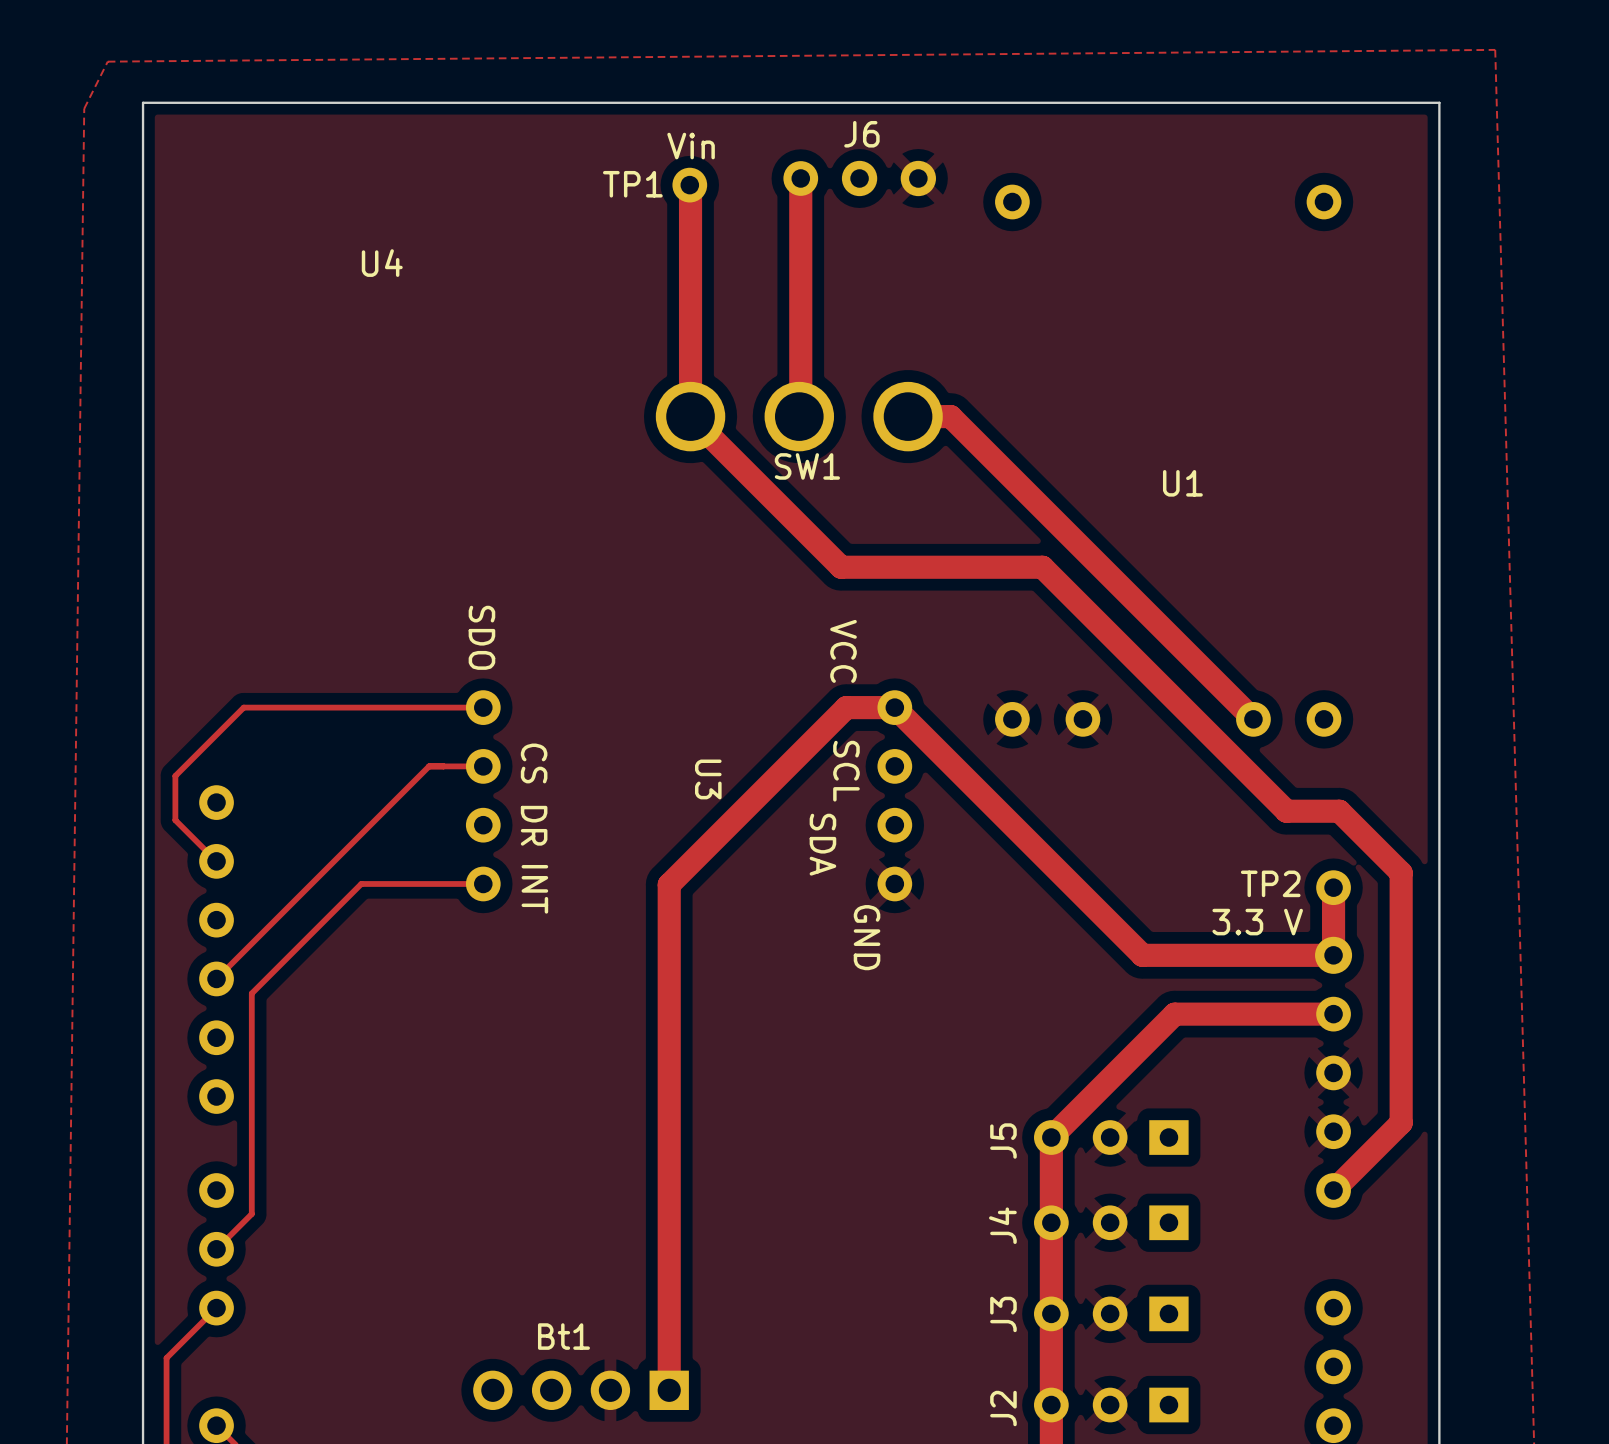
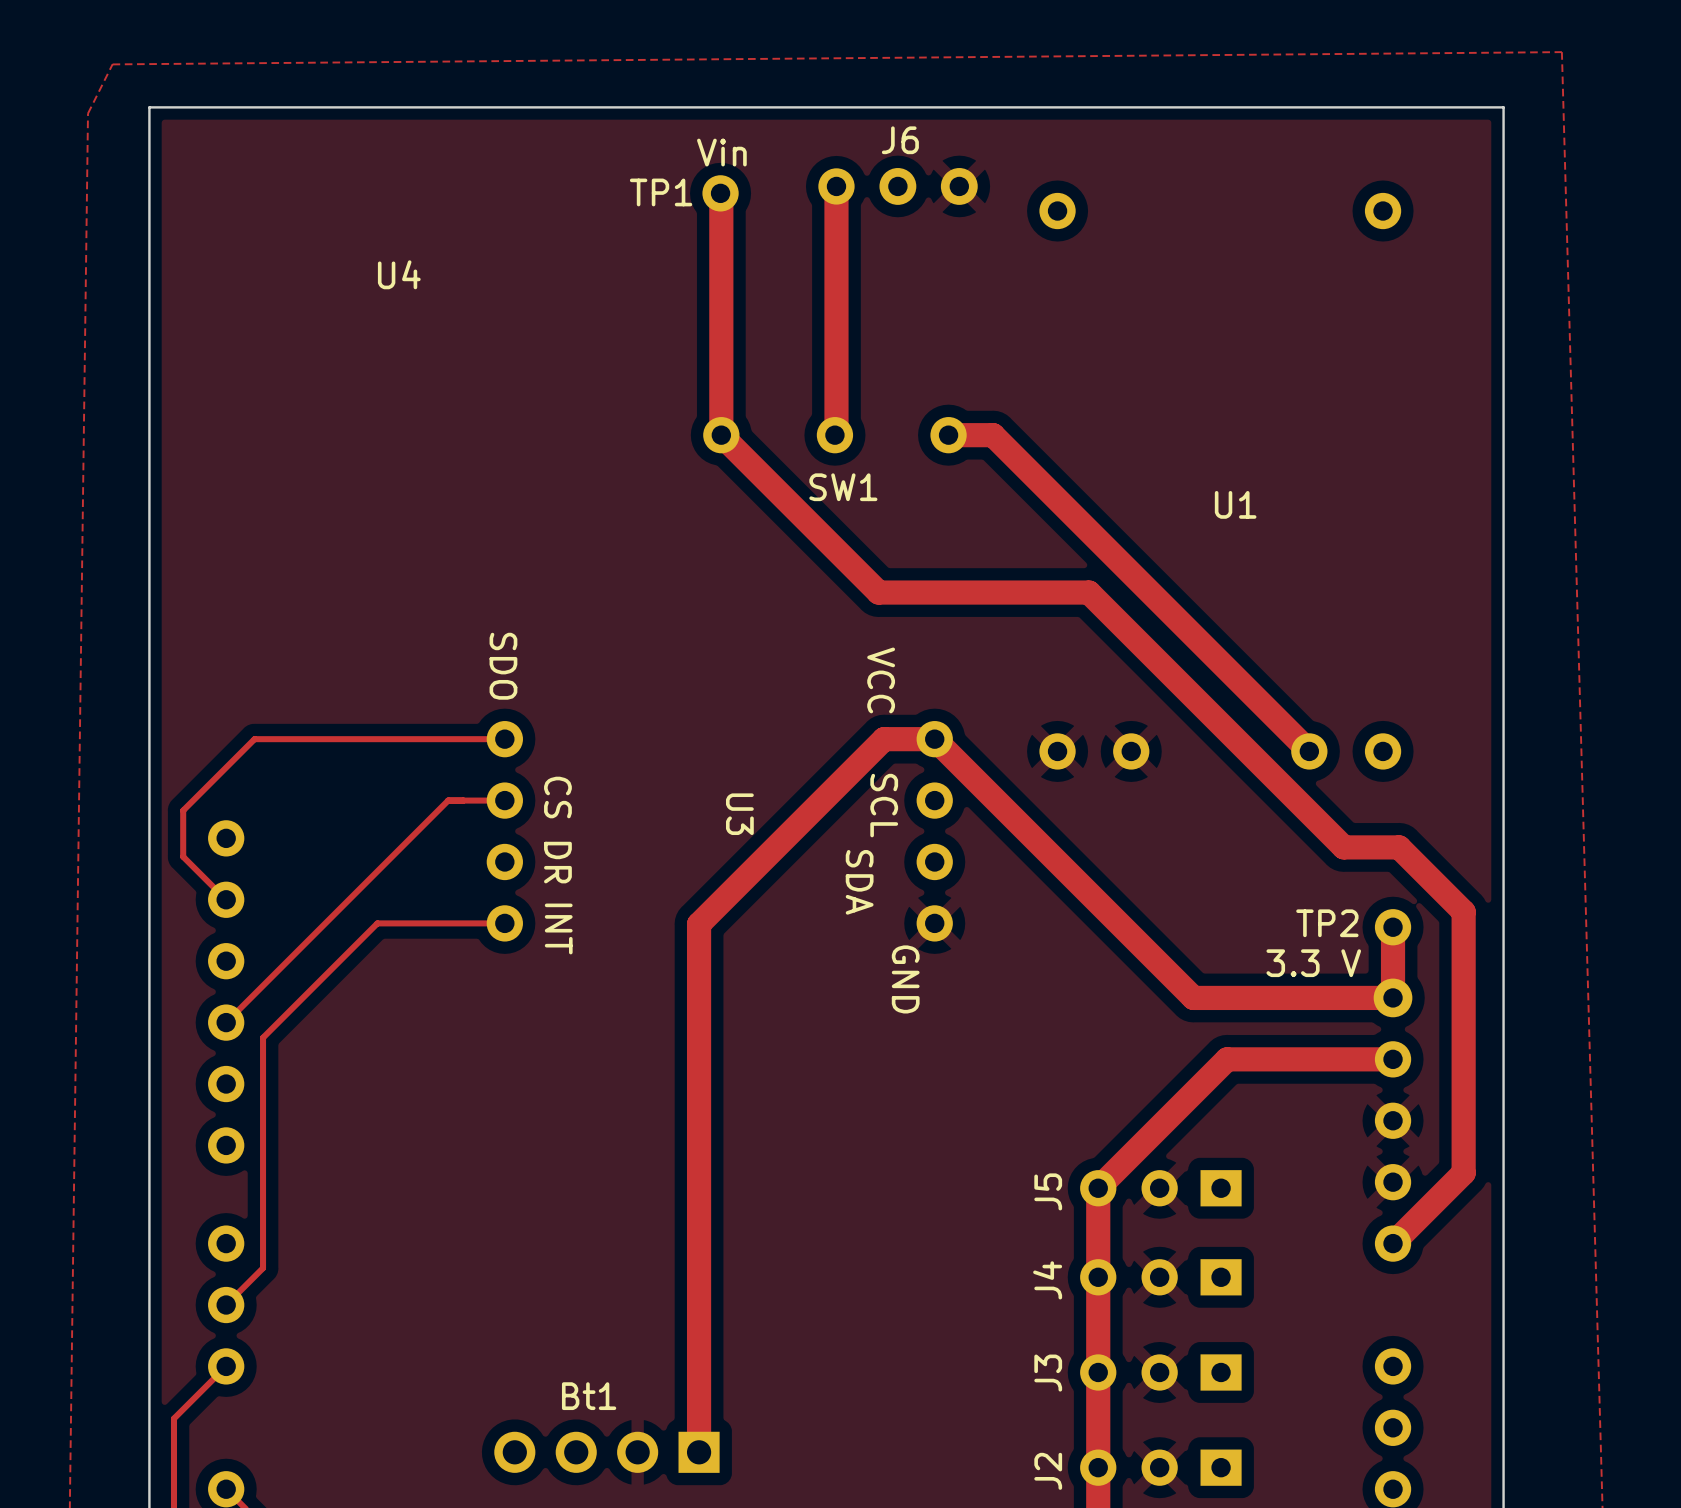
SW1 footprint: [655, 381, 943, 452] -> [703, 417, 967, 454]

